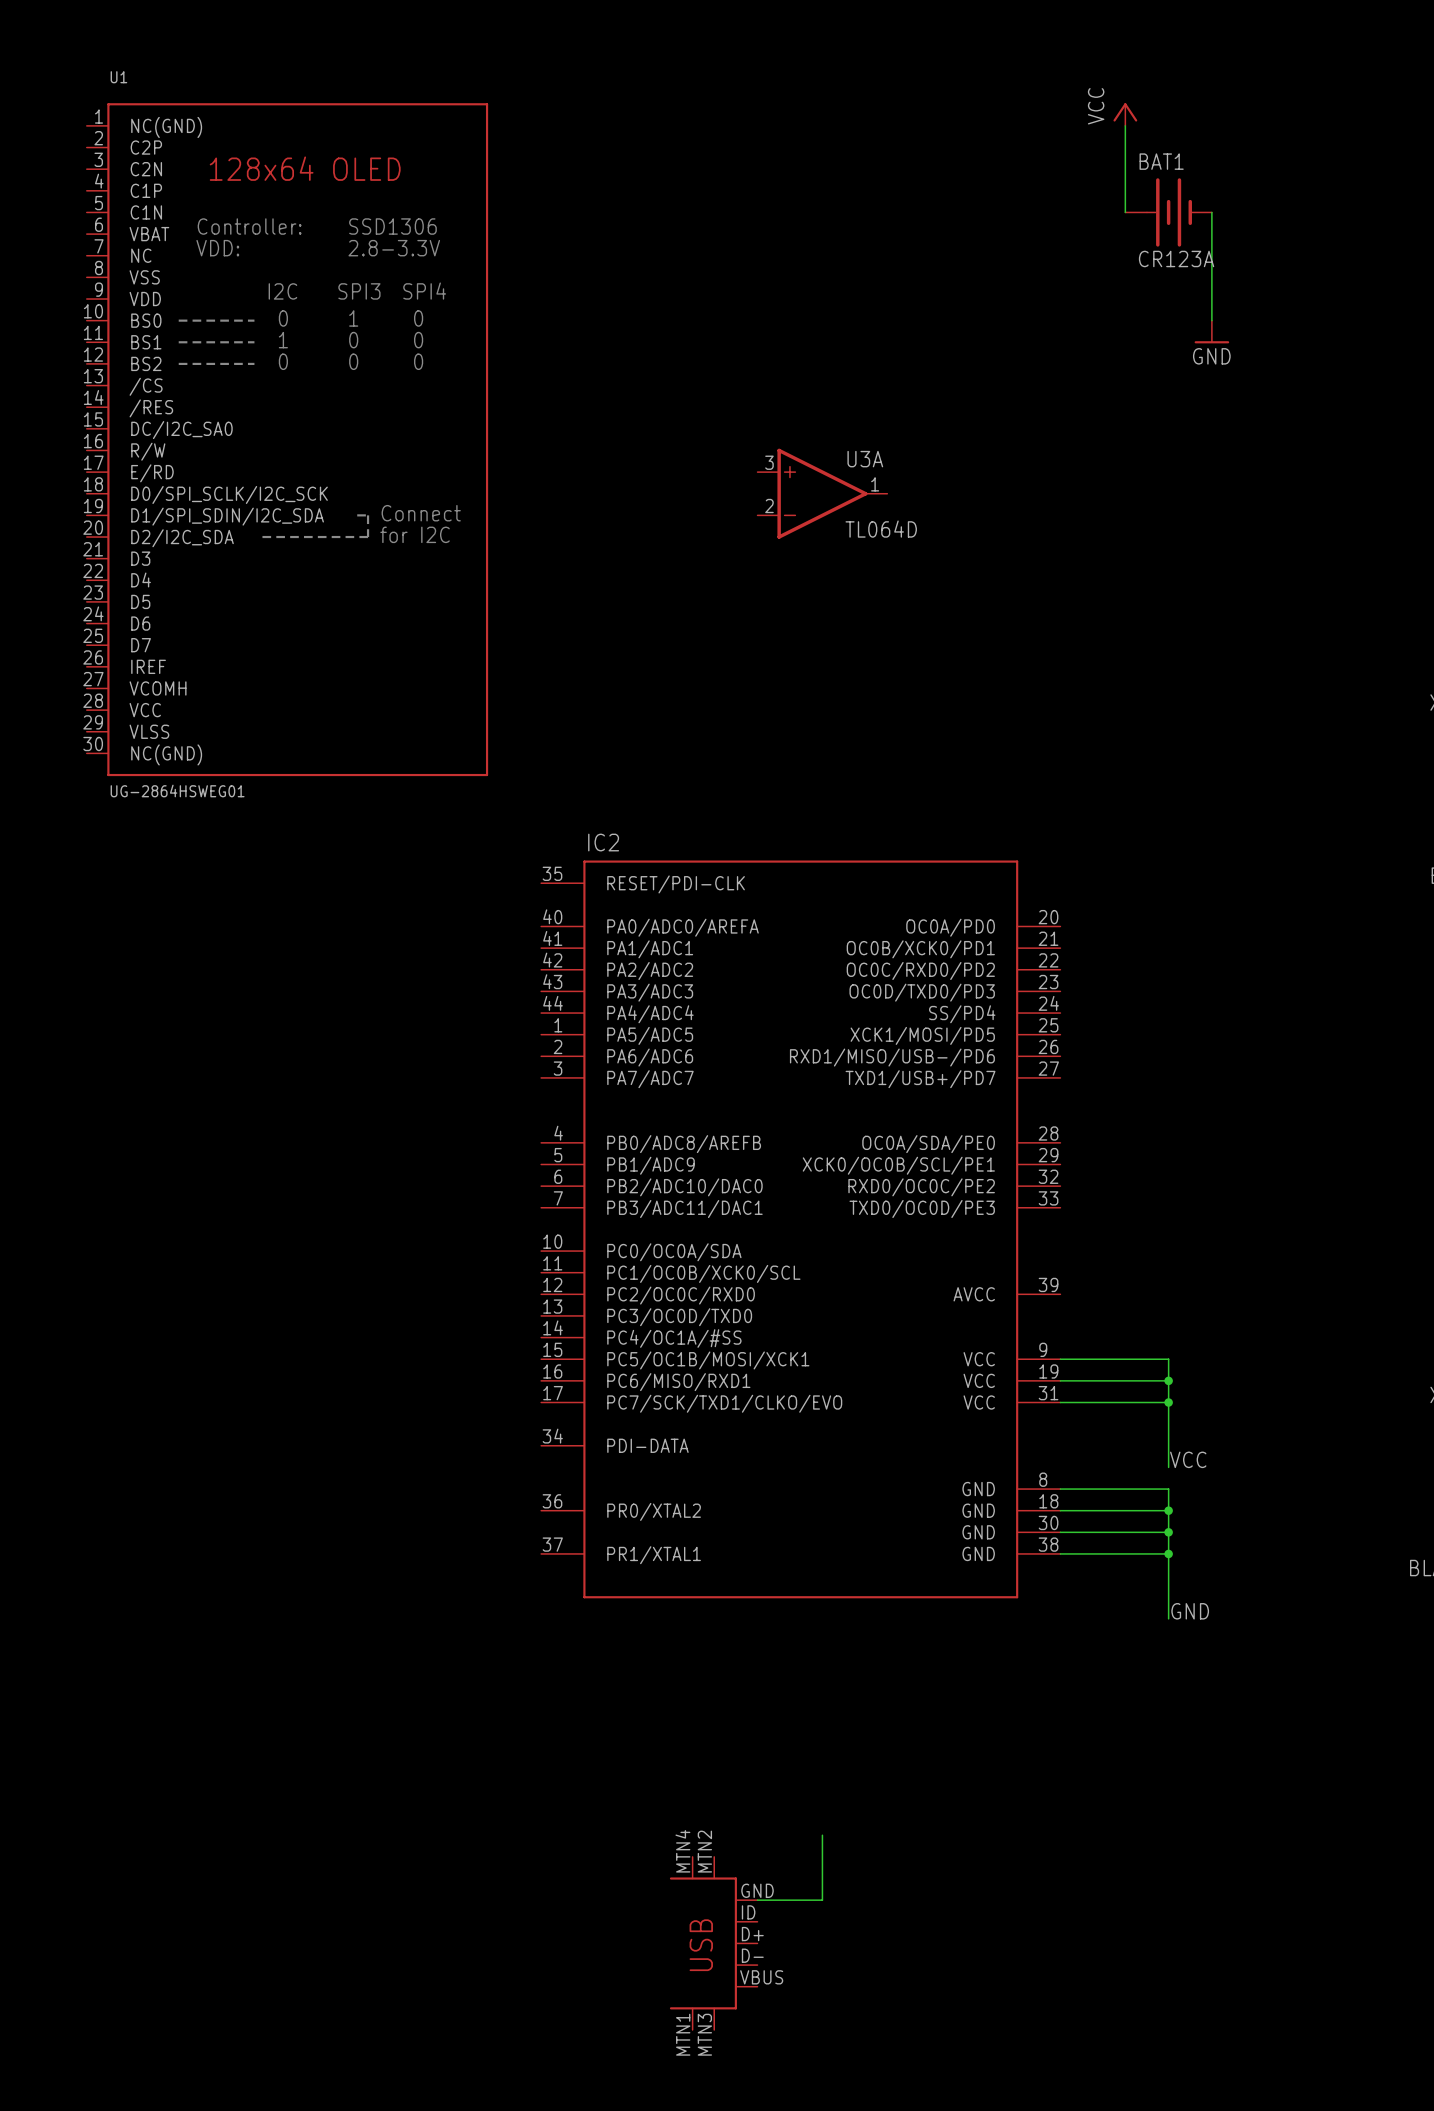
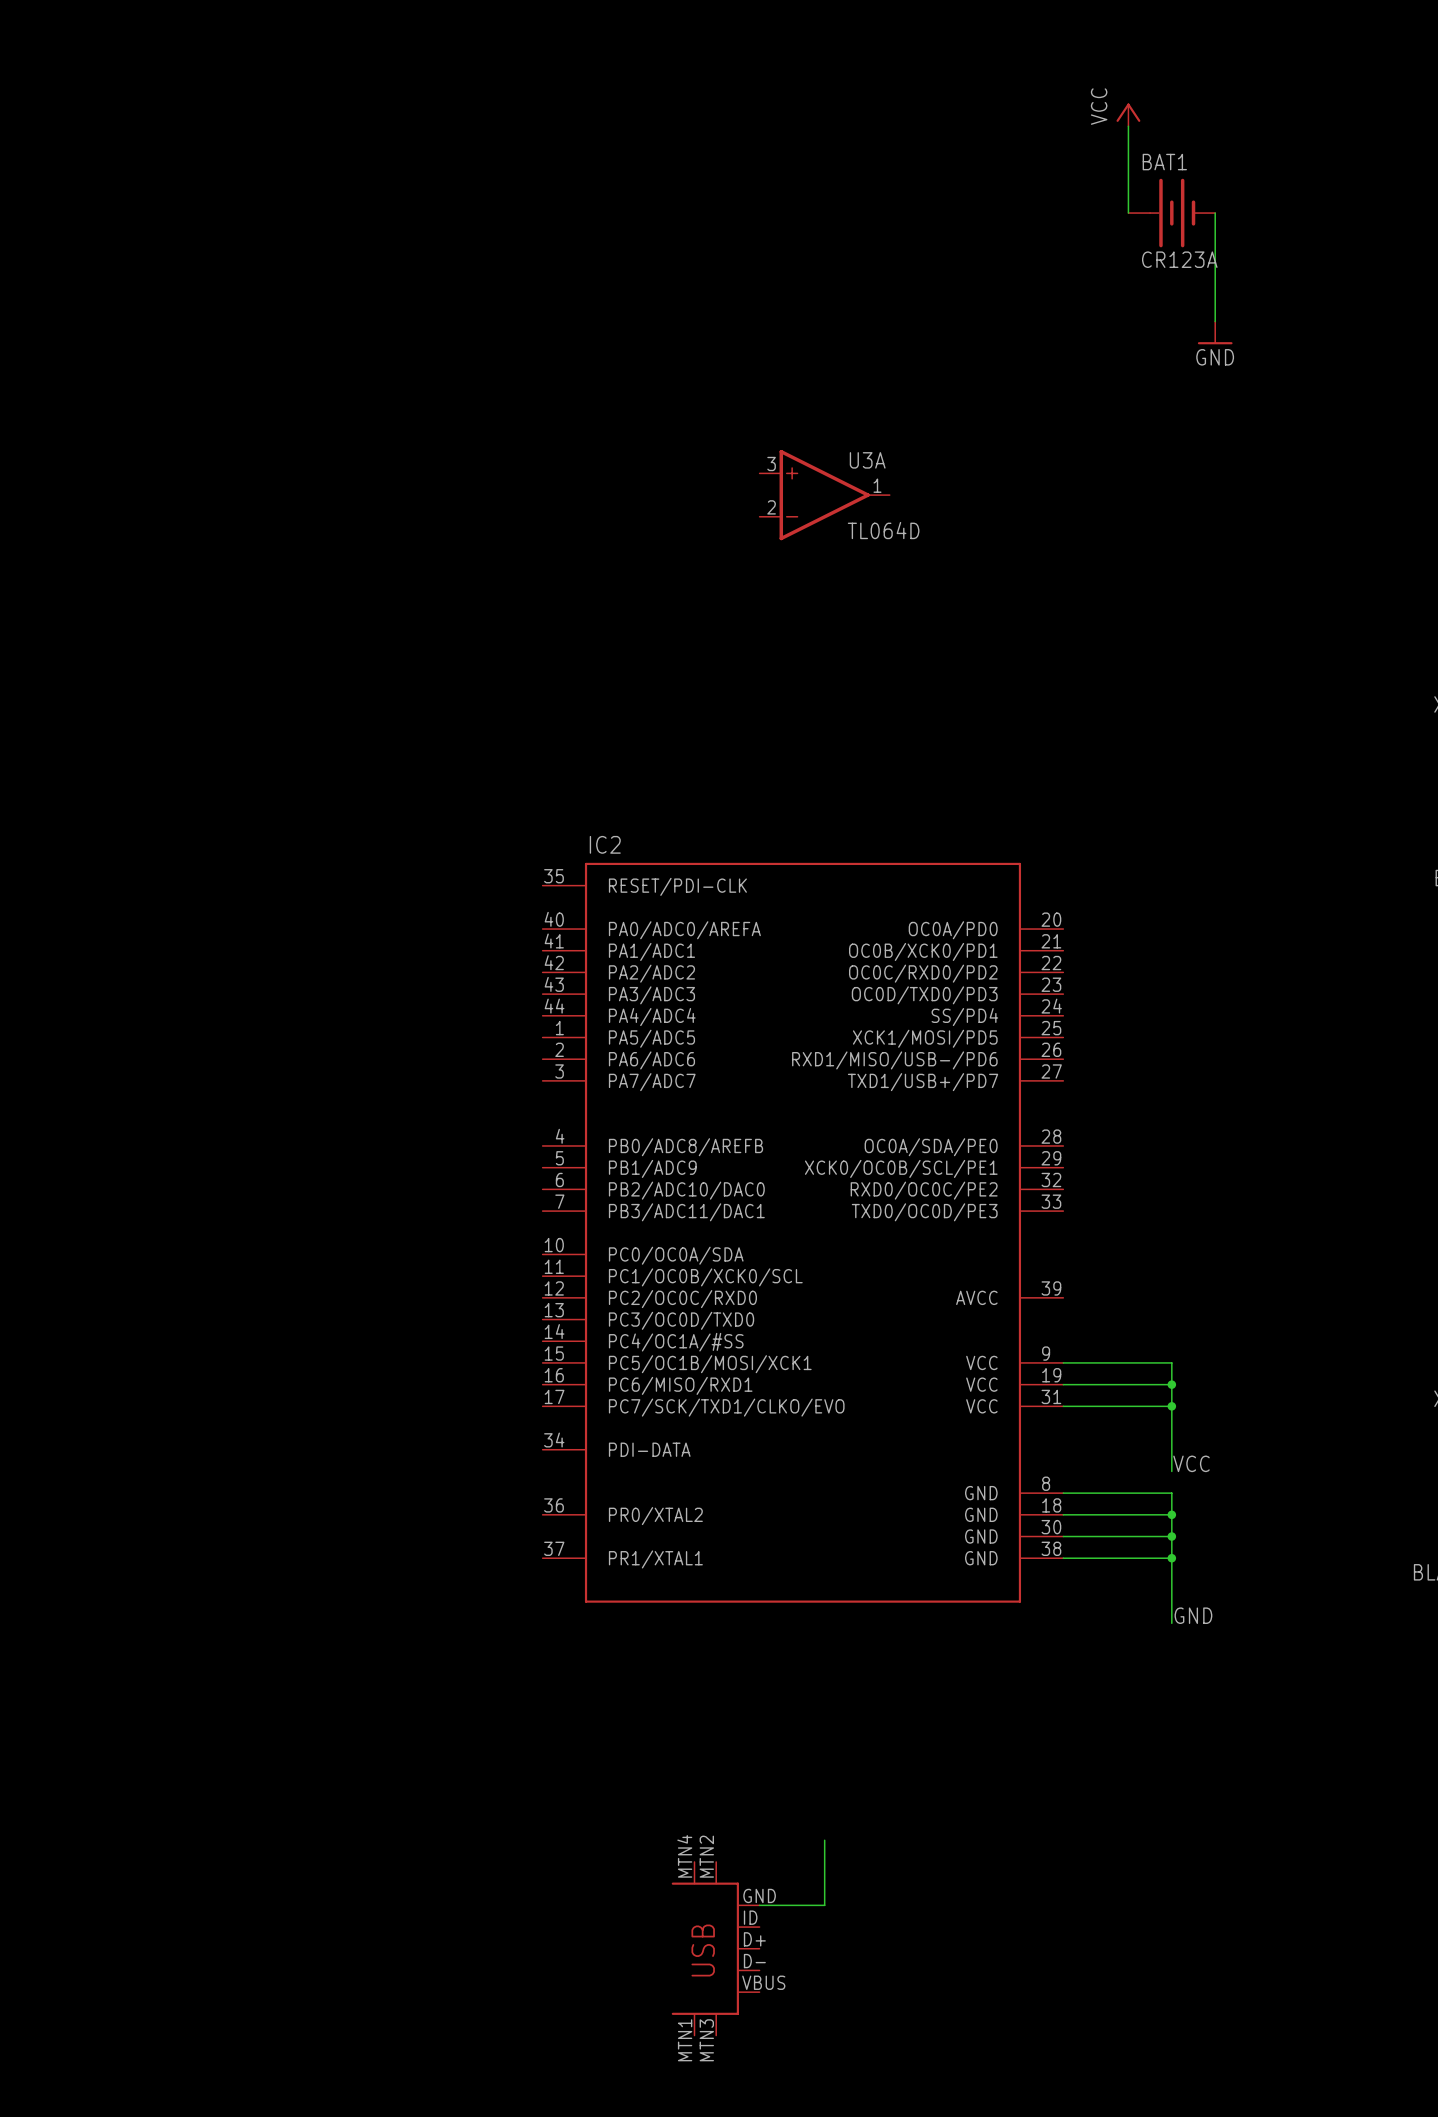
U1: UG-2864HSWEG01 (287, 439) -> none

